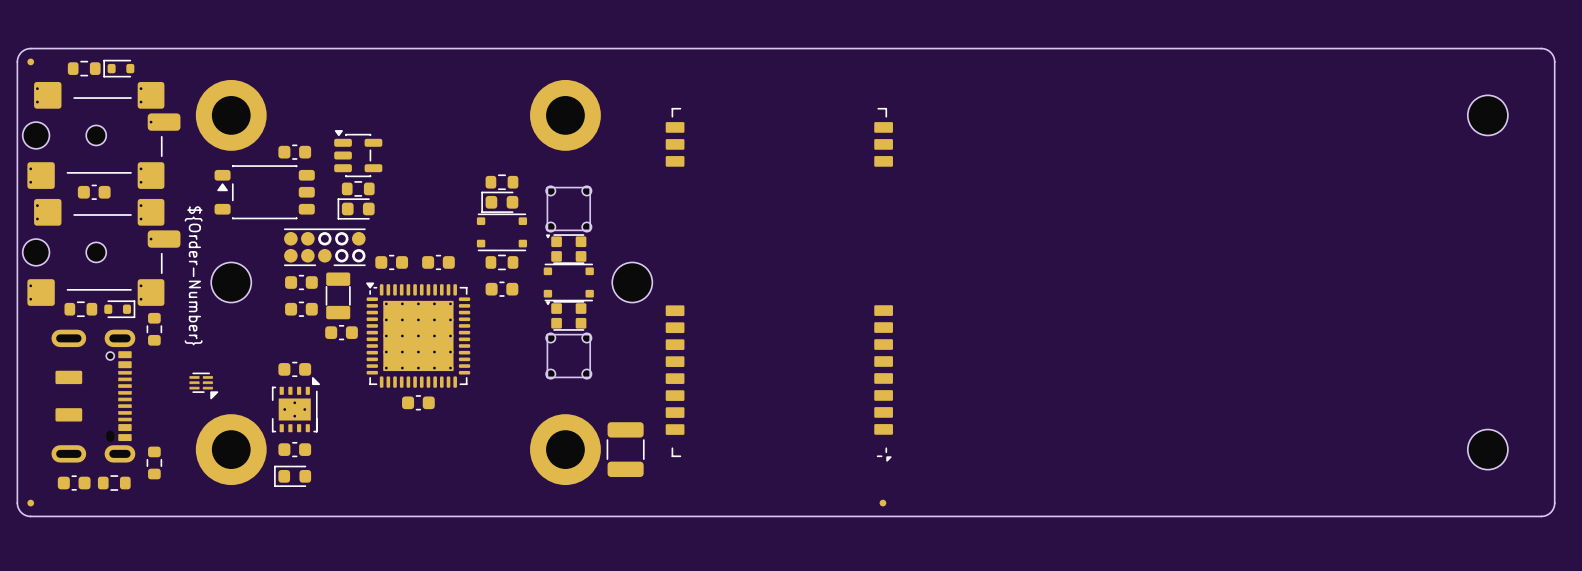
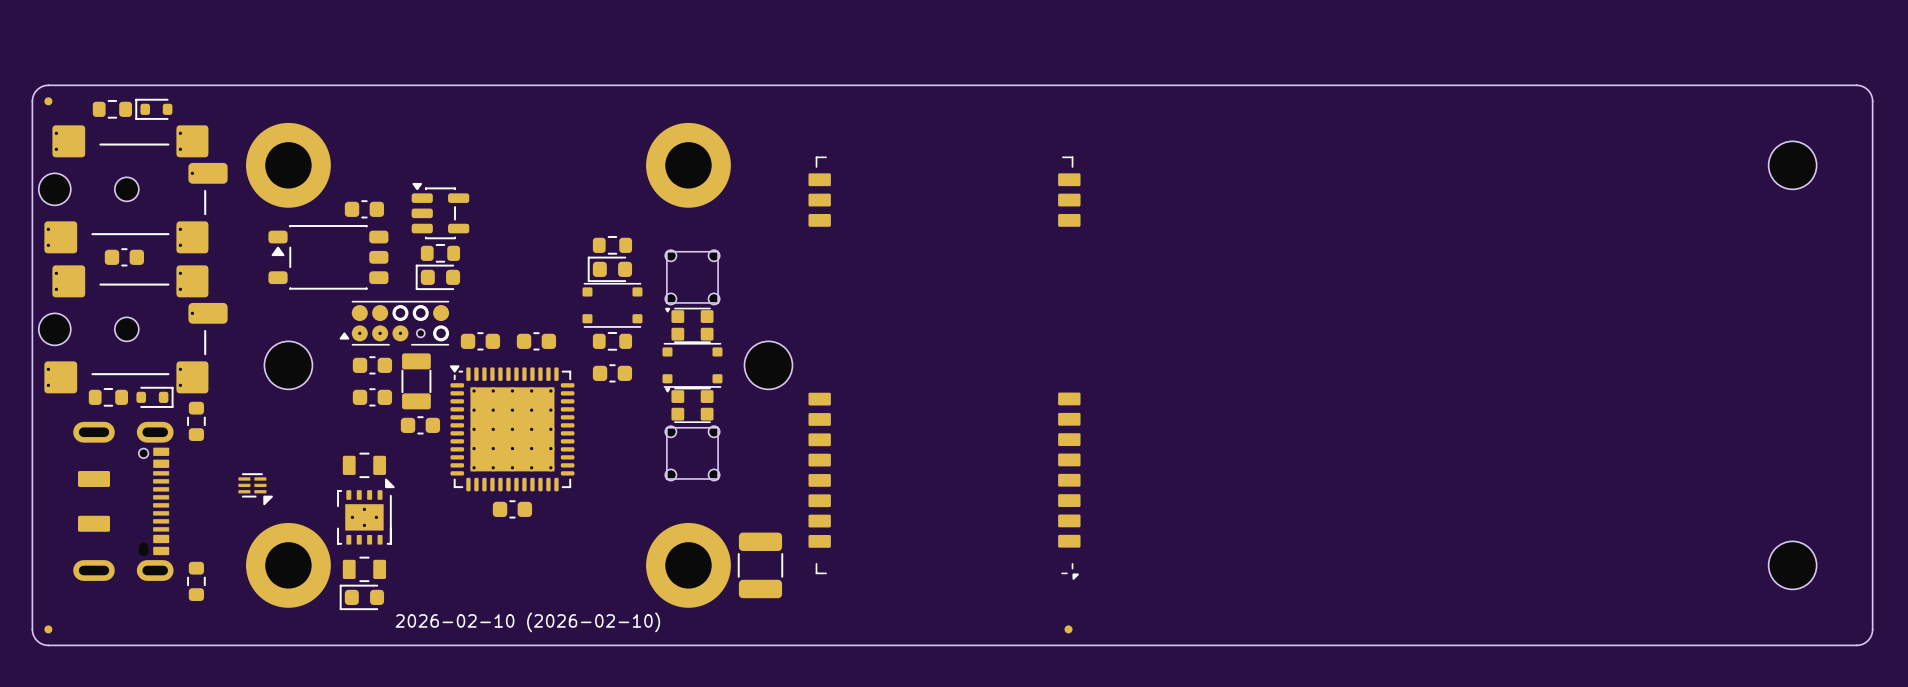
drawing: [184, 206, 203, 346] -> none
part footprint: [284, 228, 366, 266] -> [339, 300, 450, 346]
part footprint: [278, 361, 312, 378] -> [342, 452, 387, 479]
part footprint: [278, 441, 312, 458] -> [342, 556, 387, 583]
part: (74, 483) -> none
part: (114, 483) -> none
drawing: none -> [395, 612, 661, 633]

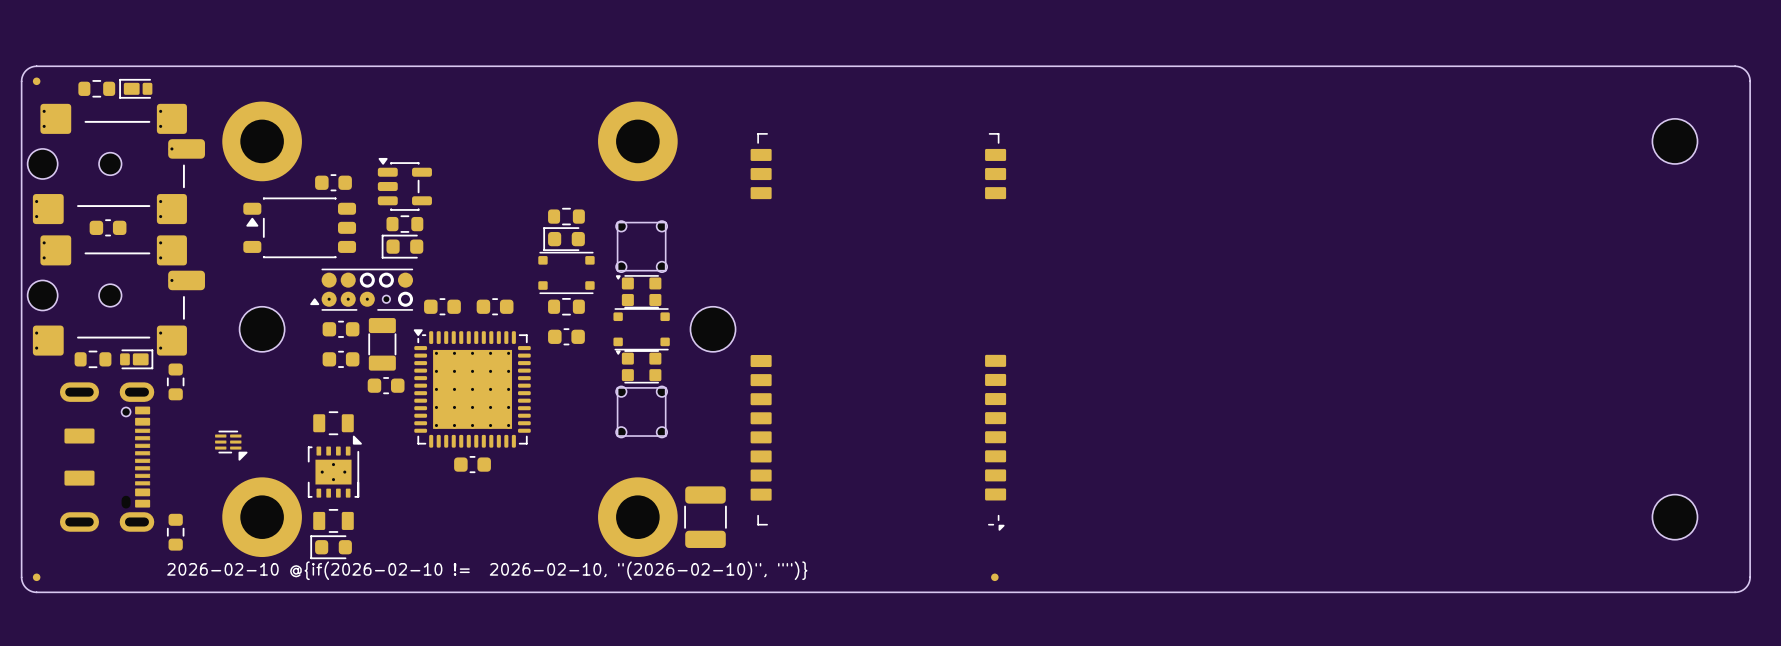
part footprint: [135, 98, 173, 120] -> [119, 78, 153, 99]
part footprint: [136, 386, 174, 408] -> [120, 349, 154, 370]
drawing shape: [395, 612, 661, 633] -> [167, 561, 808, 581]

